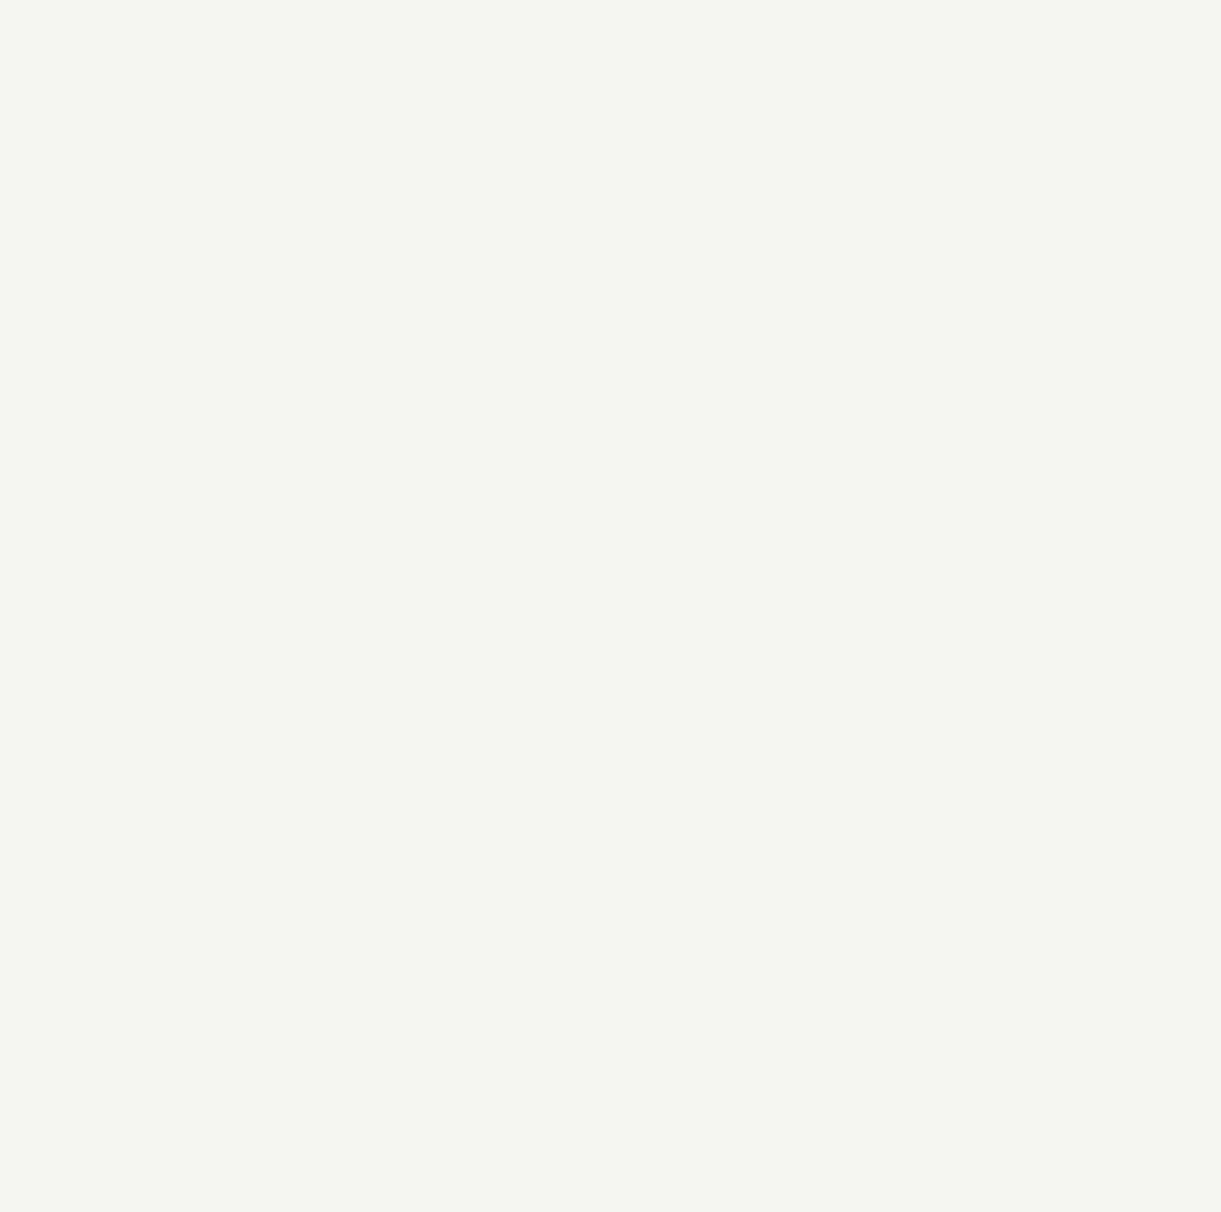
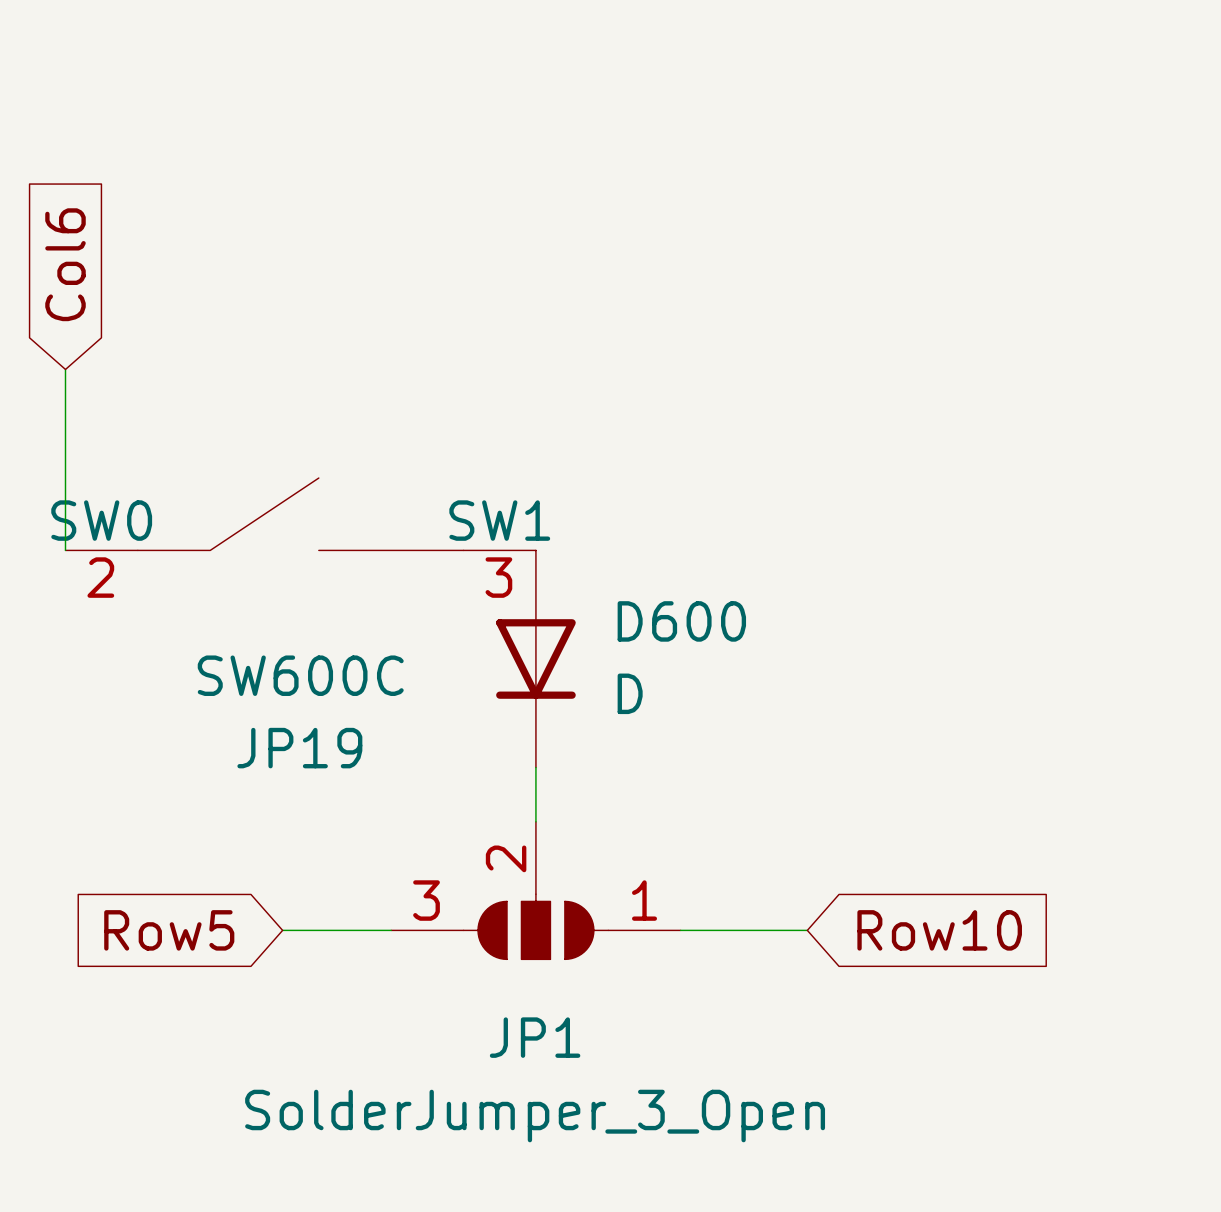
global label: none -> Col6 (65, 264)
wire: none -> (65, 369) (65, 550)
SW600C: none -> JP19 (300, 514)
D600: none -> D (535, 658)
wire: none -> (535, 767) (535, 821)
JP1: none -> SolderJumper_3_Open (535, 890)
global label: none -> Row5 (169, 930)
wire: none -> (282, 930) (391, 930)
wire: none -> (680, 930) (807, 930)
global label: none -> Row10 (939, 930)

